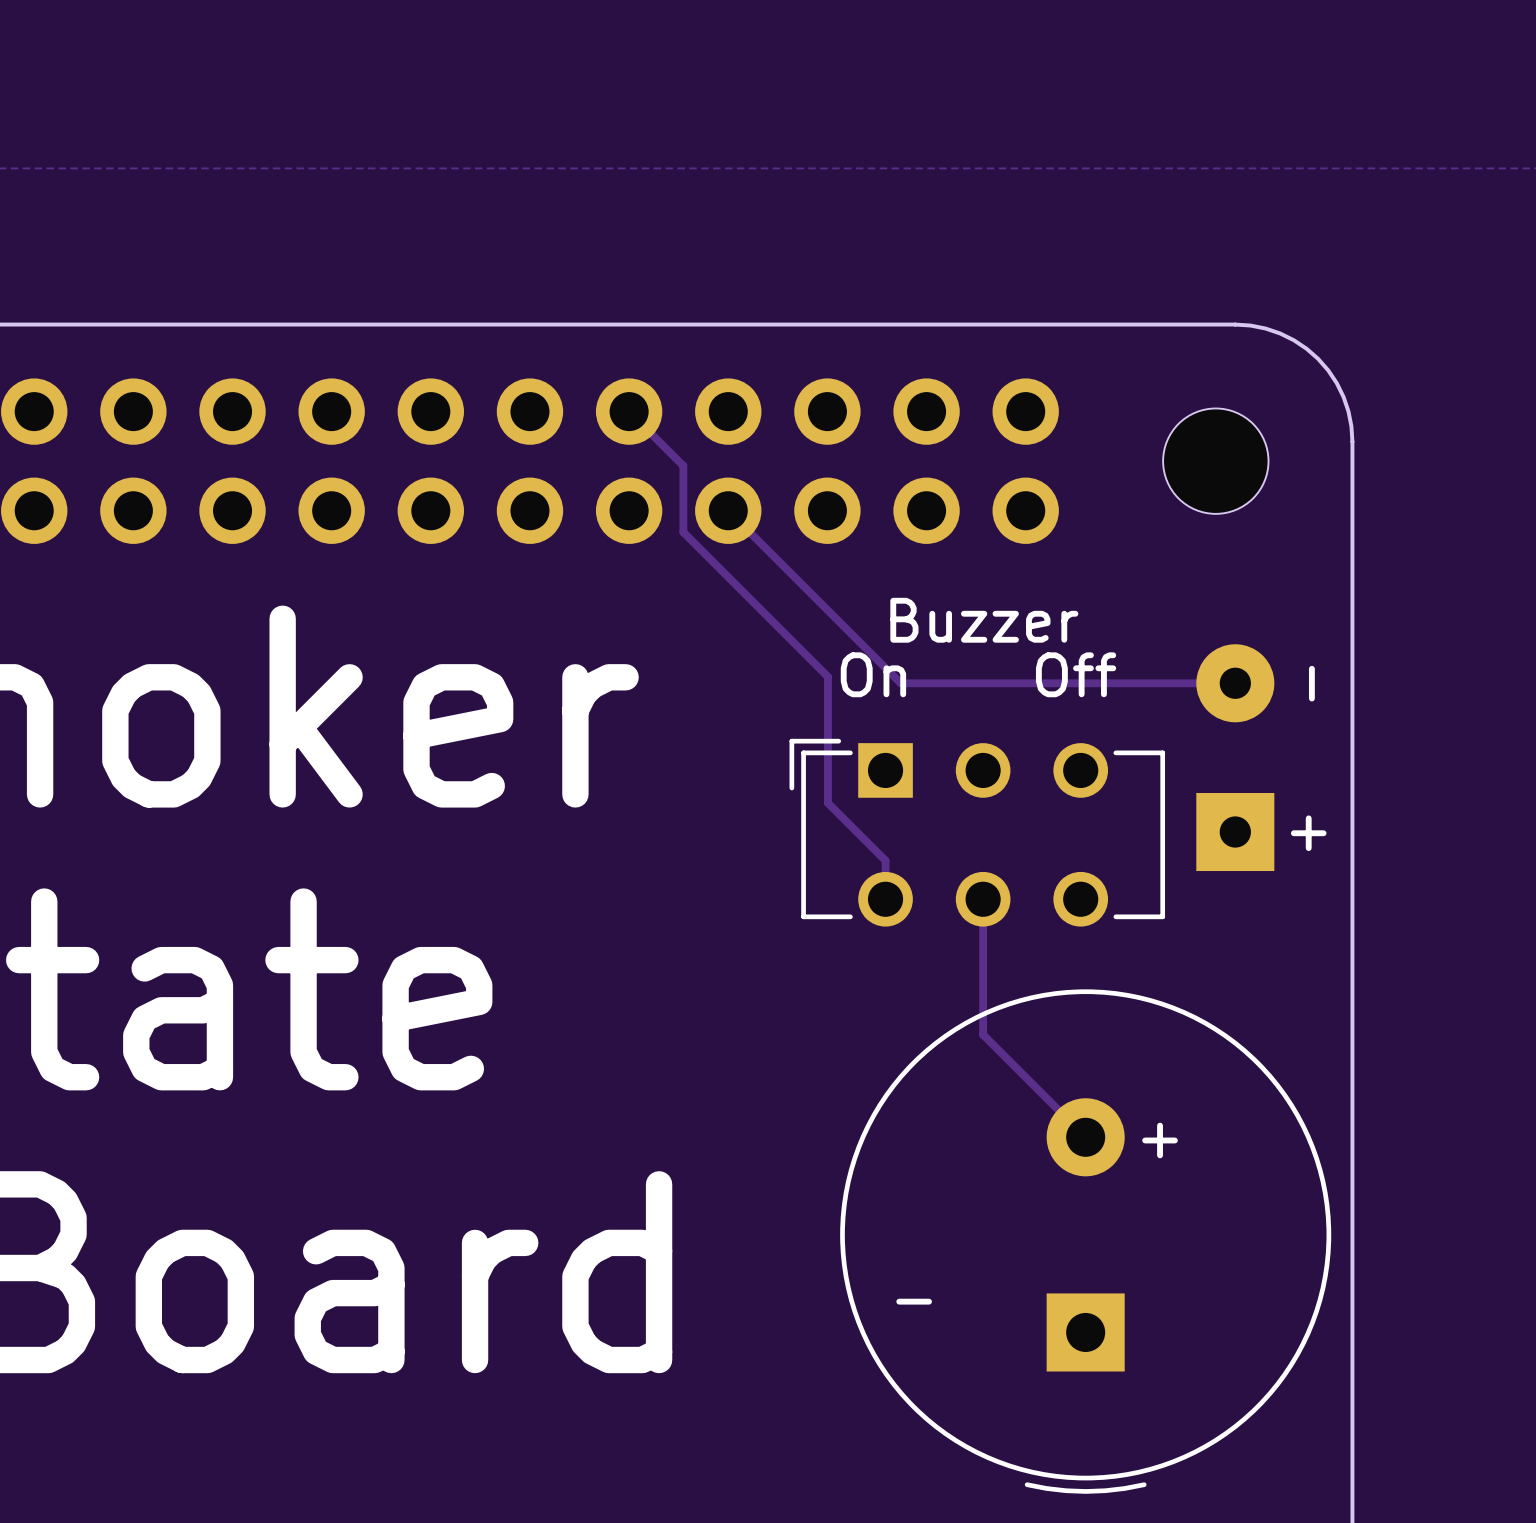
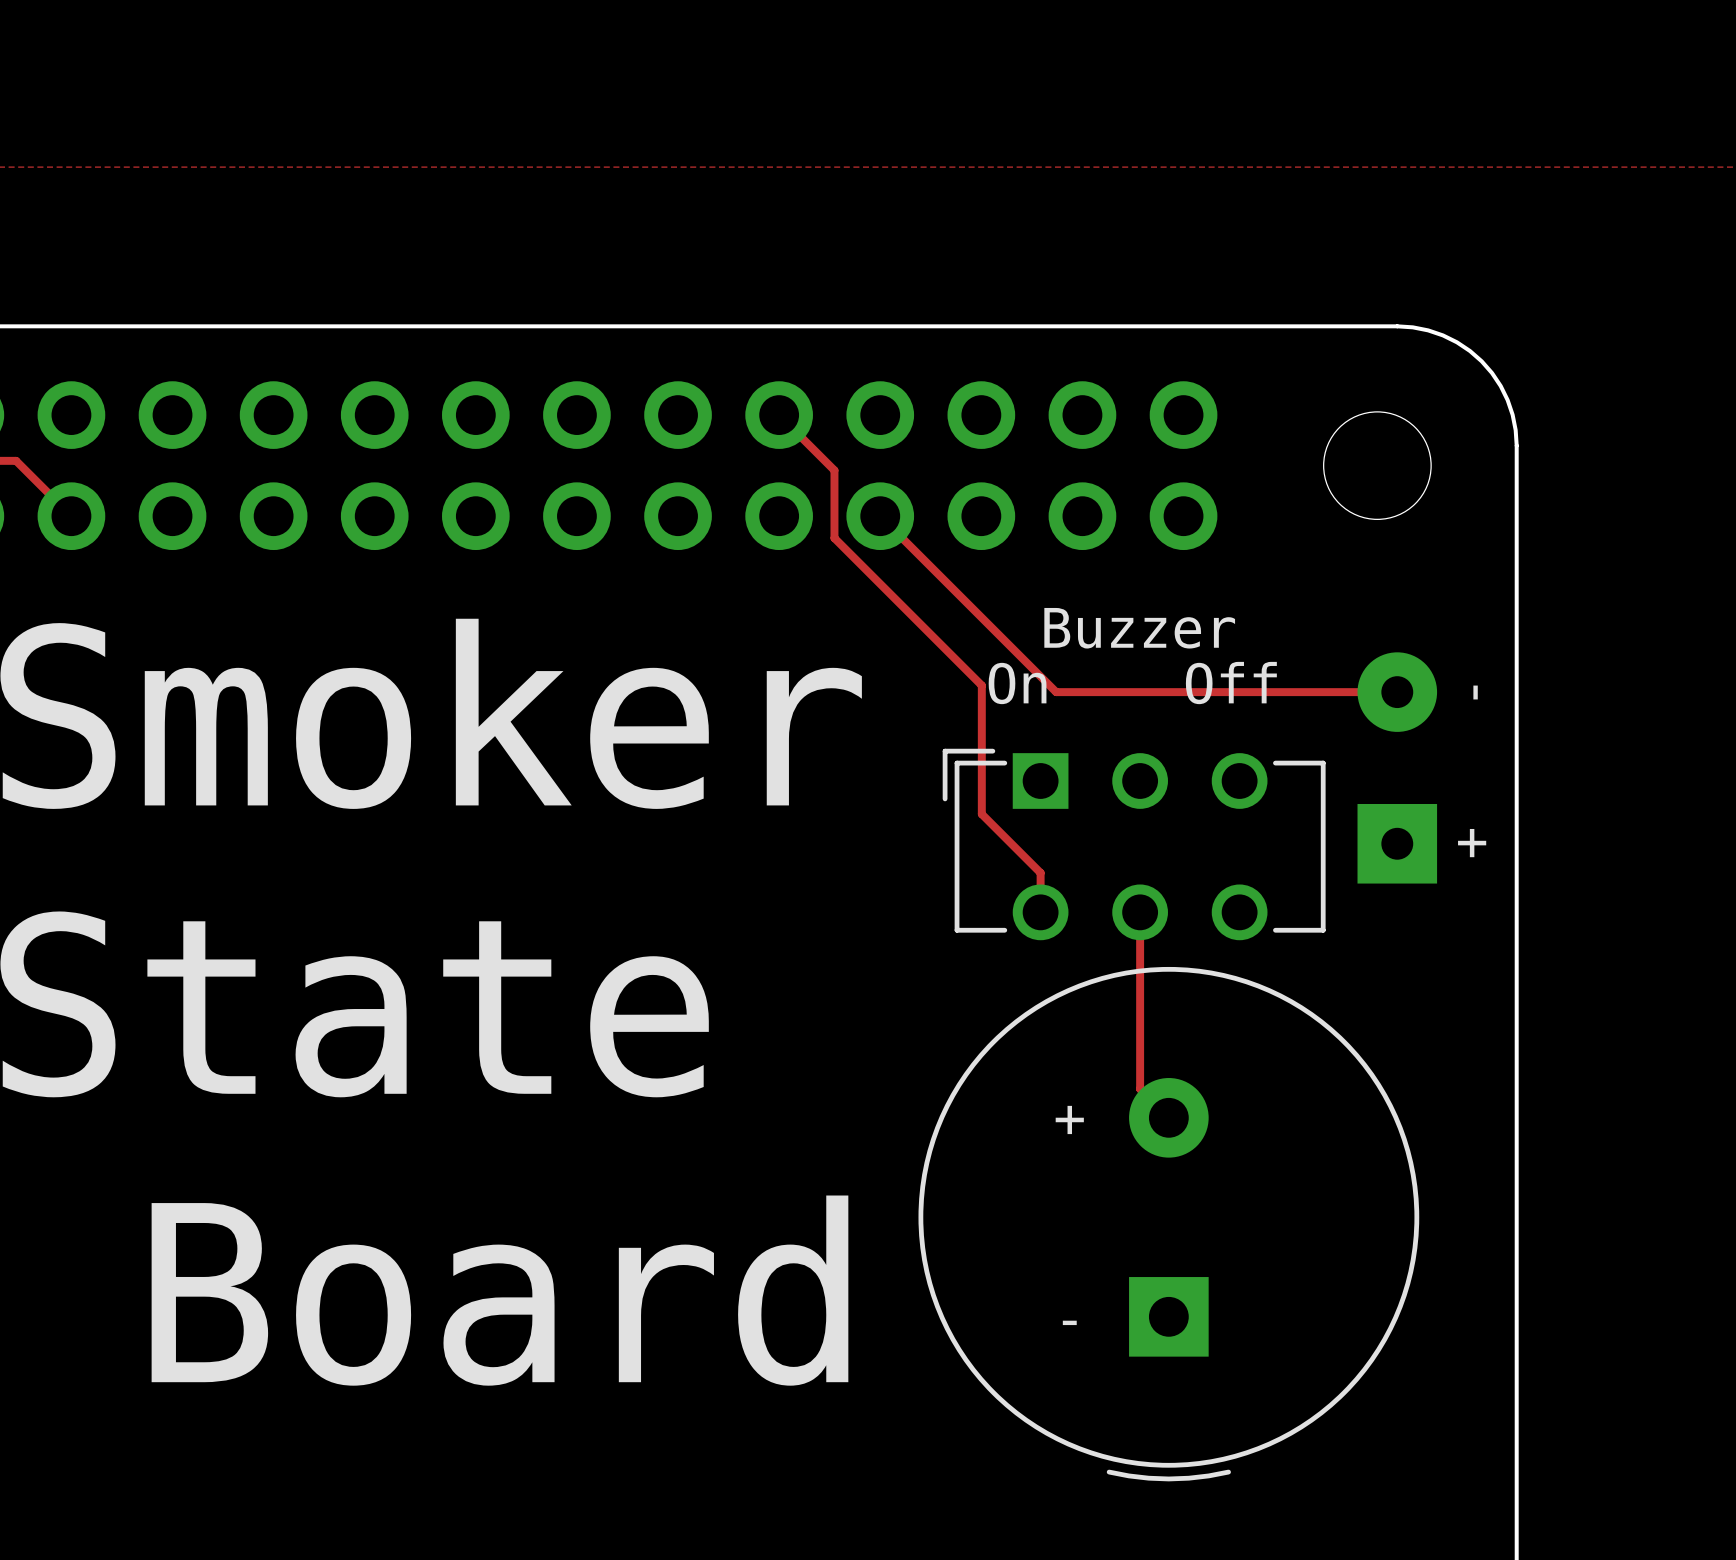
track: (983, 1034) (1085, 1137) -> (1140, 1050) (1140, 1089) (1168, 1117)
text position: + (1160, 1140) -> + (1069, 1119)
part position: (1085, 1241) -> (1168, 1224)

